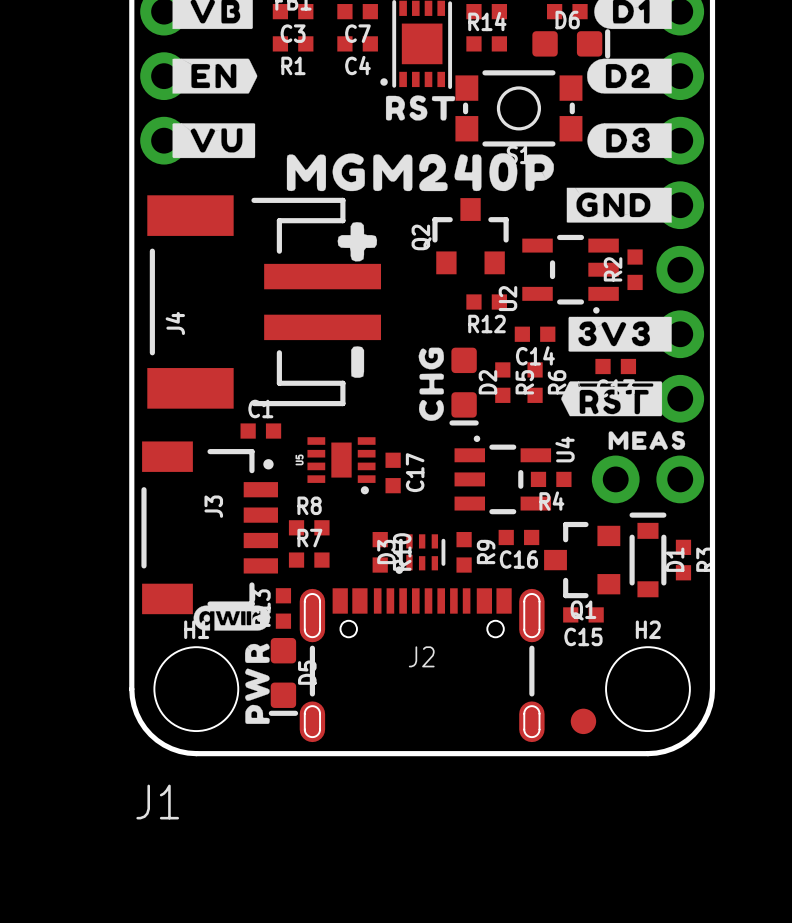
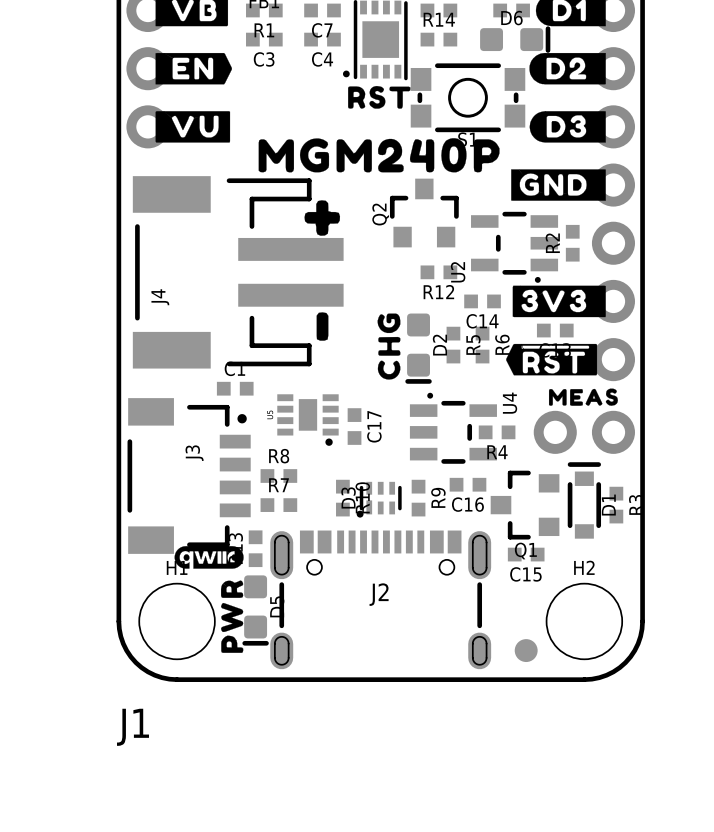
C3 name: C3 (293, 33) -> R1 (264, 30)
R1 name: R1 (293, 65) -> C3 (264, 59)

